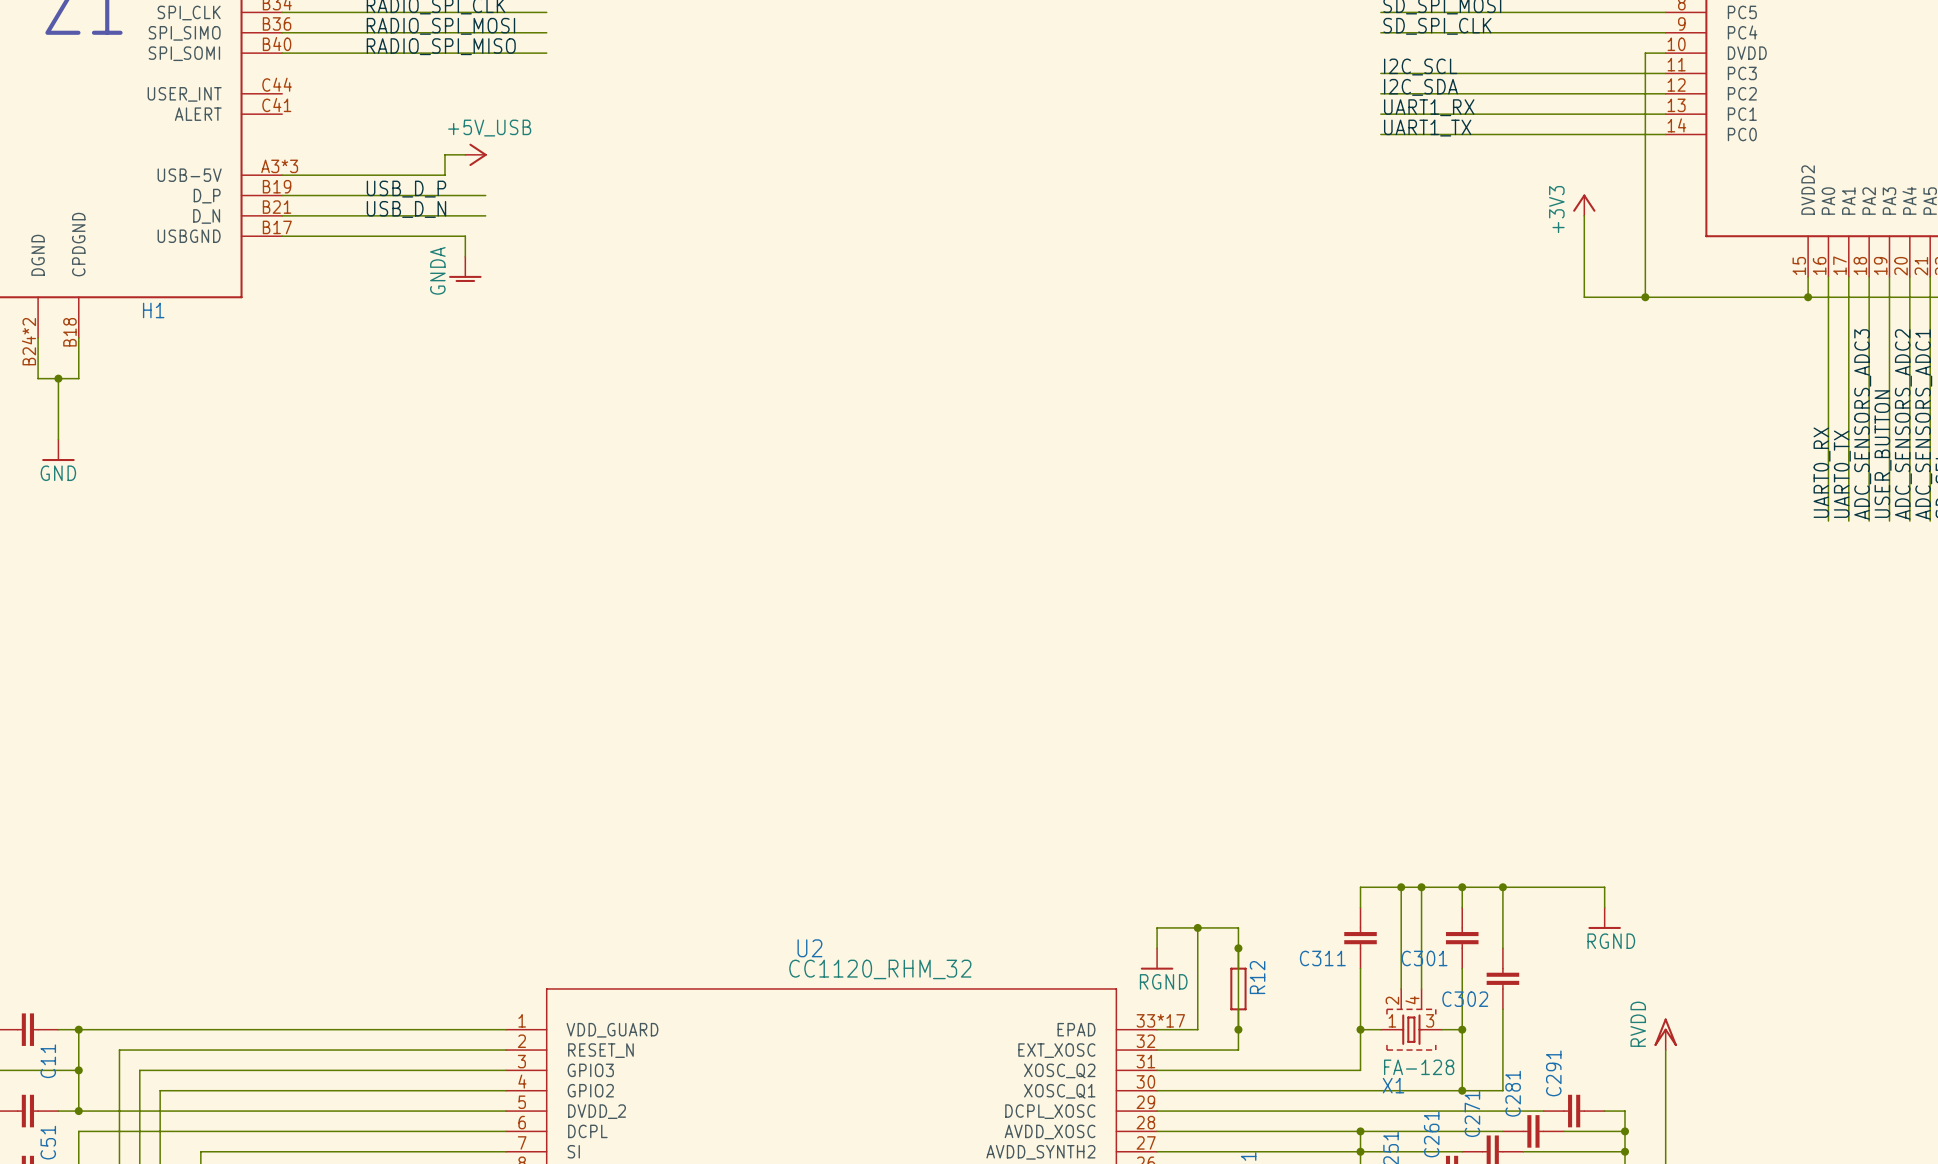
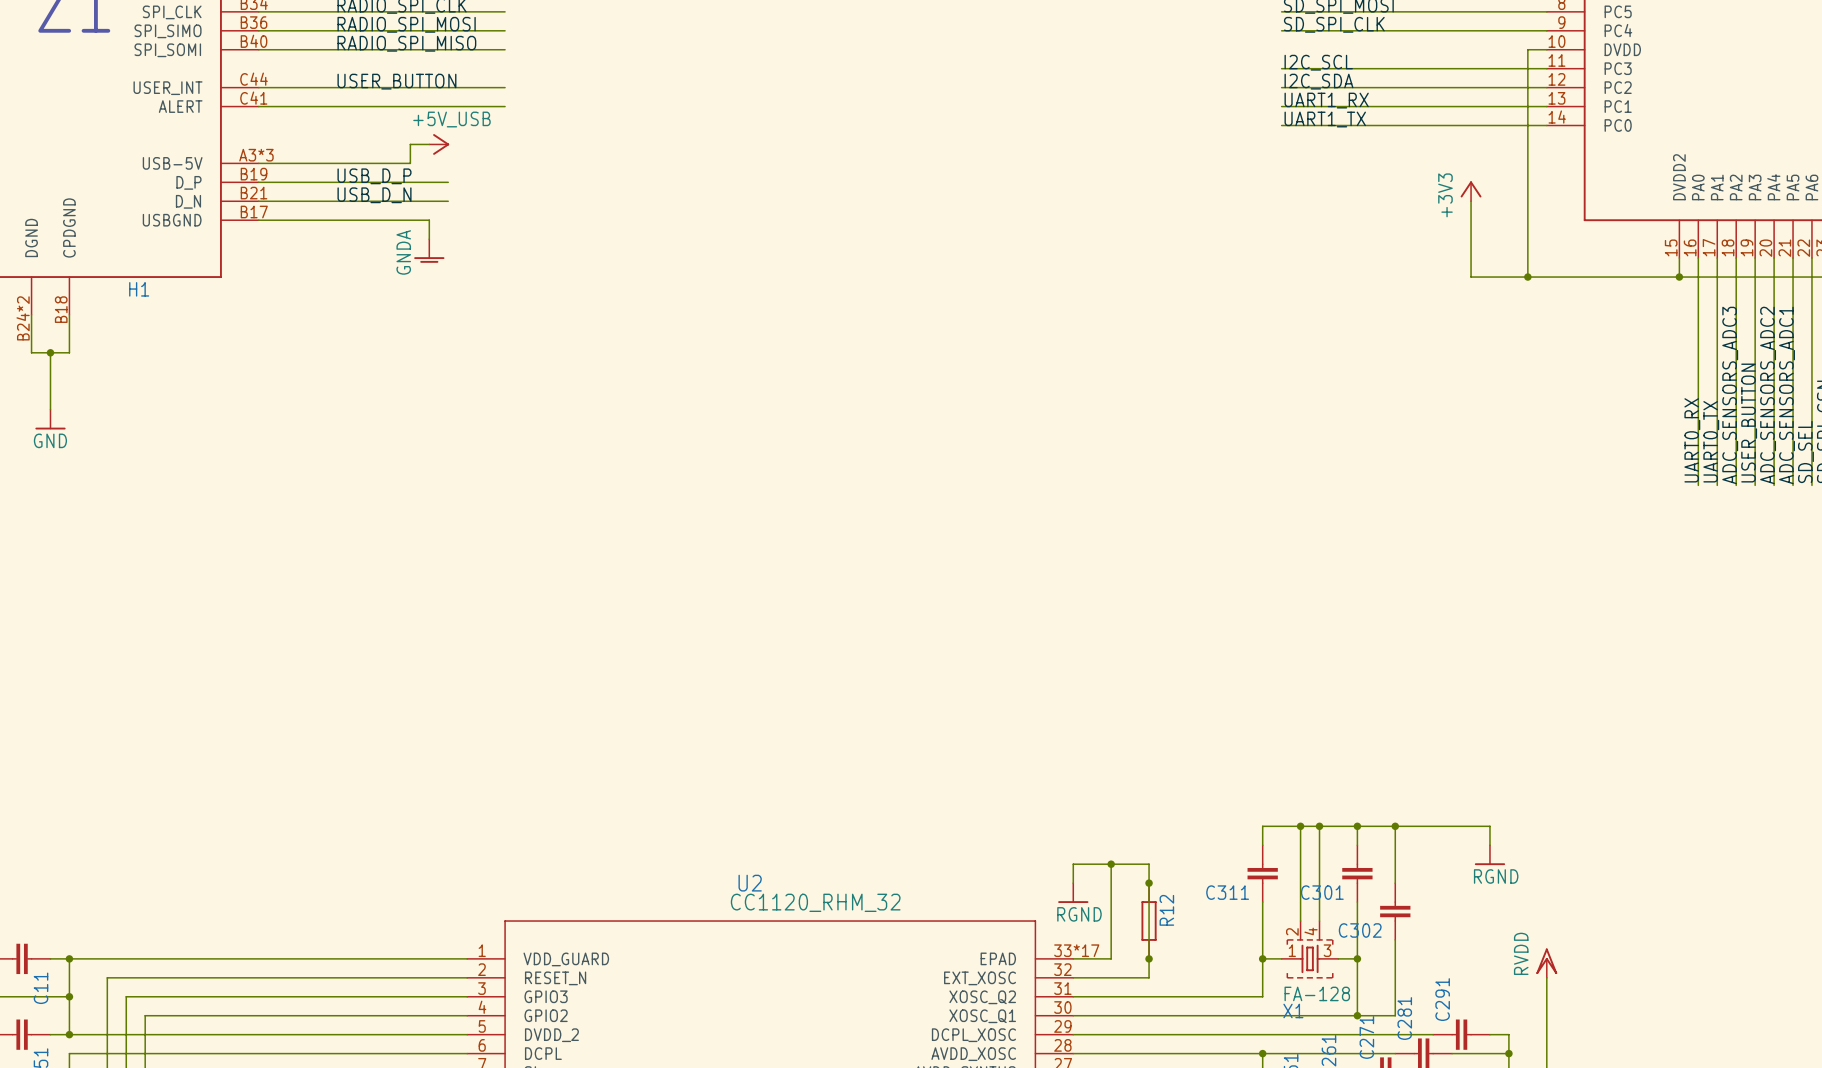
label: none -> USER_BUTTON (396, 81)
wire: none -> (258, 87) (505, 87)
wire: none -> (258, 106) (505, 106)

